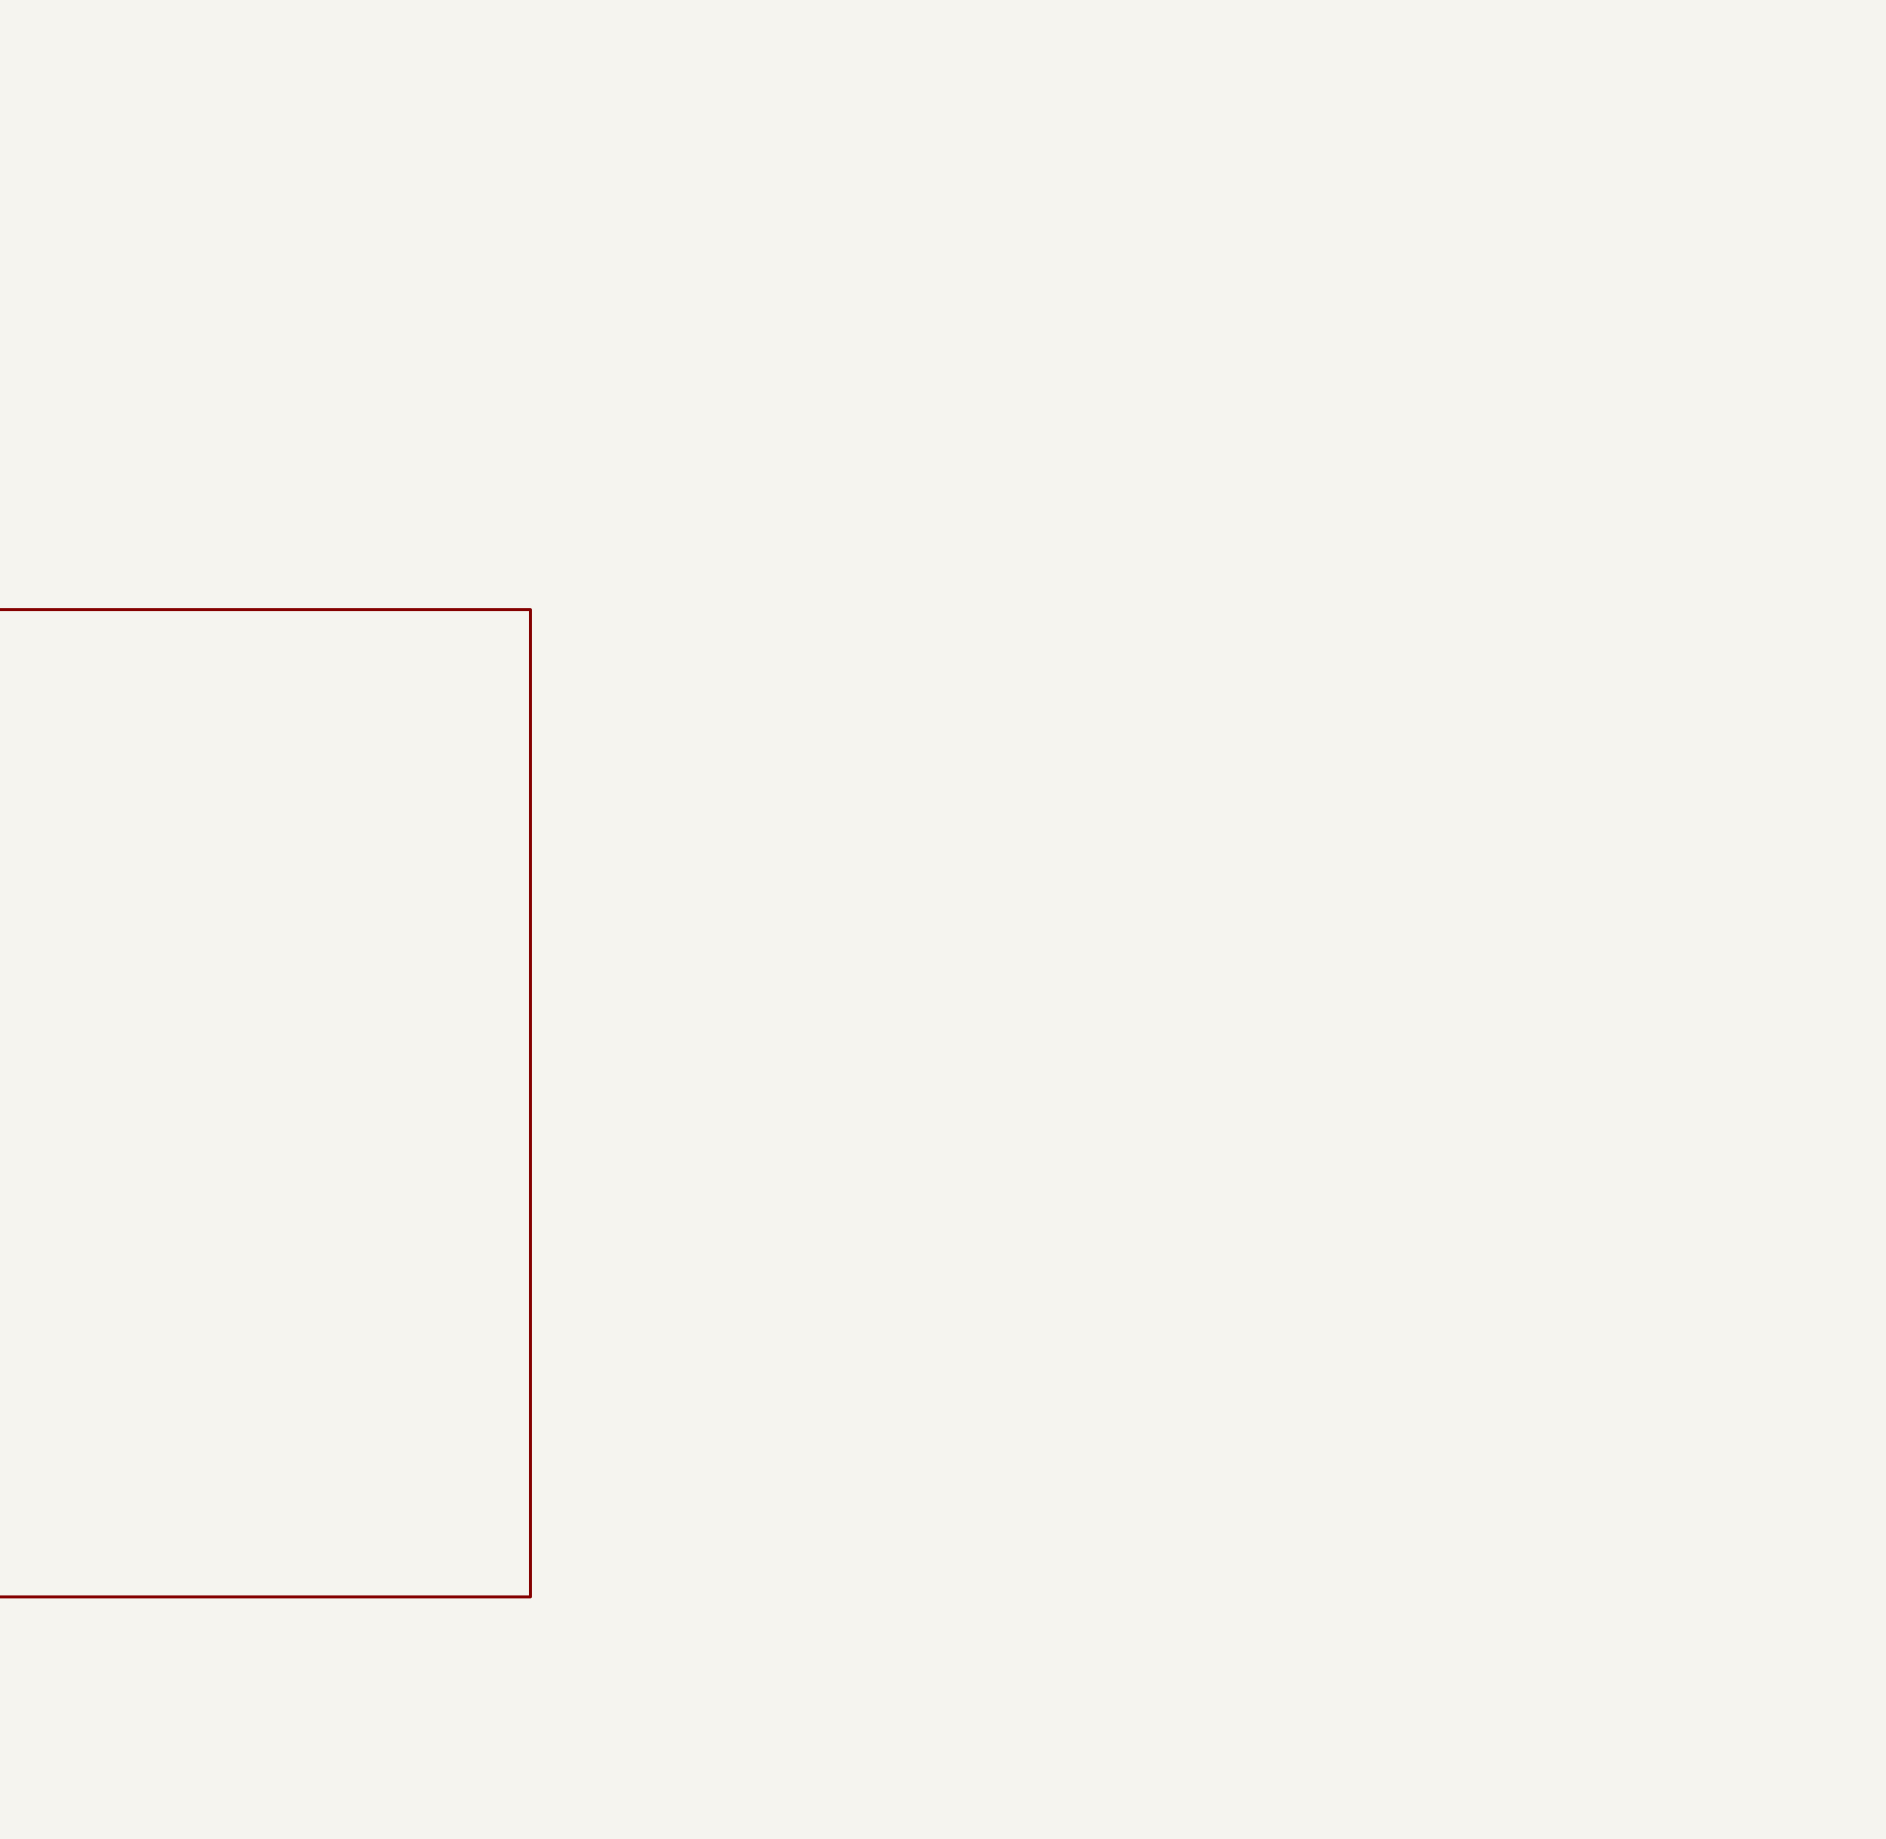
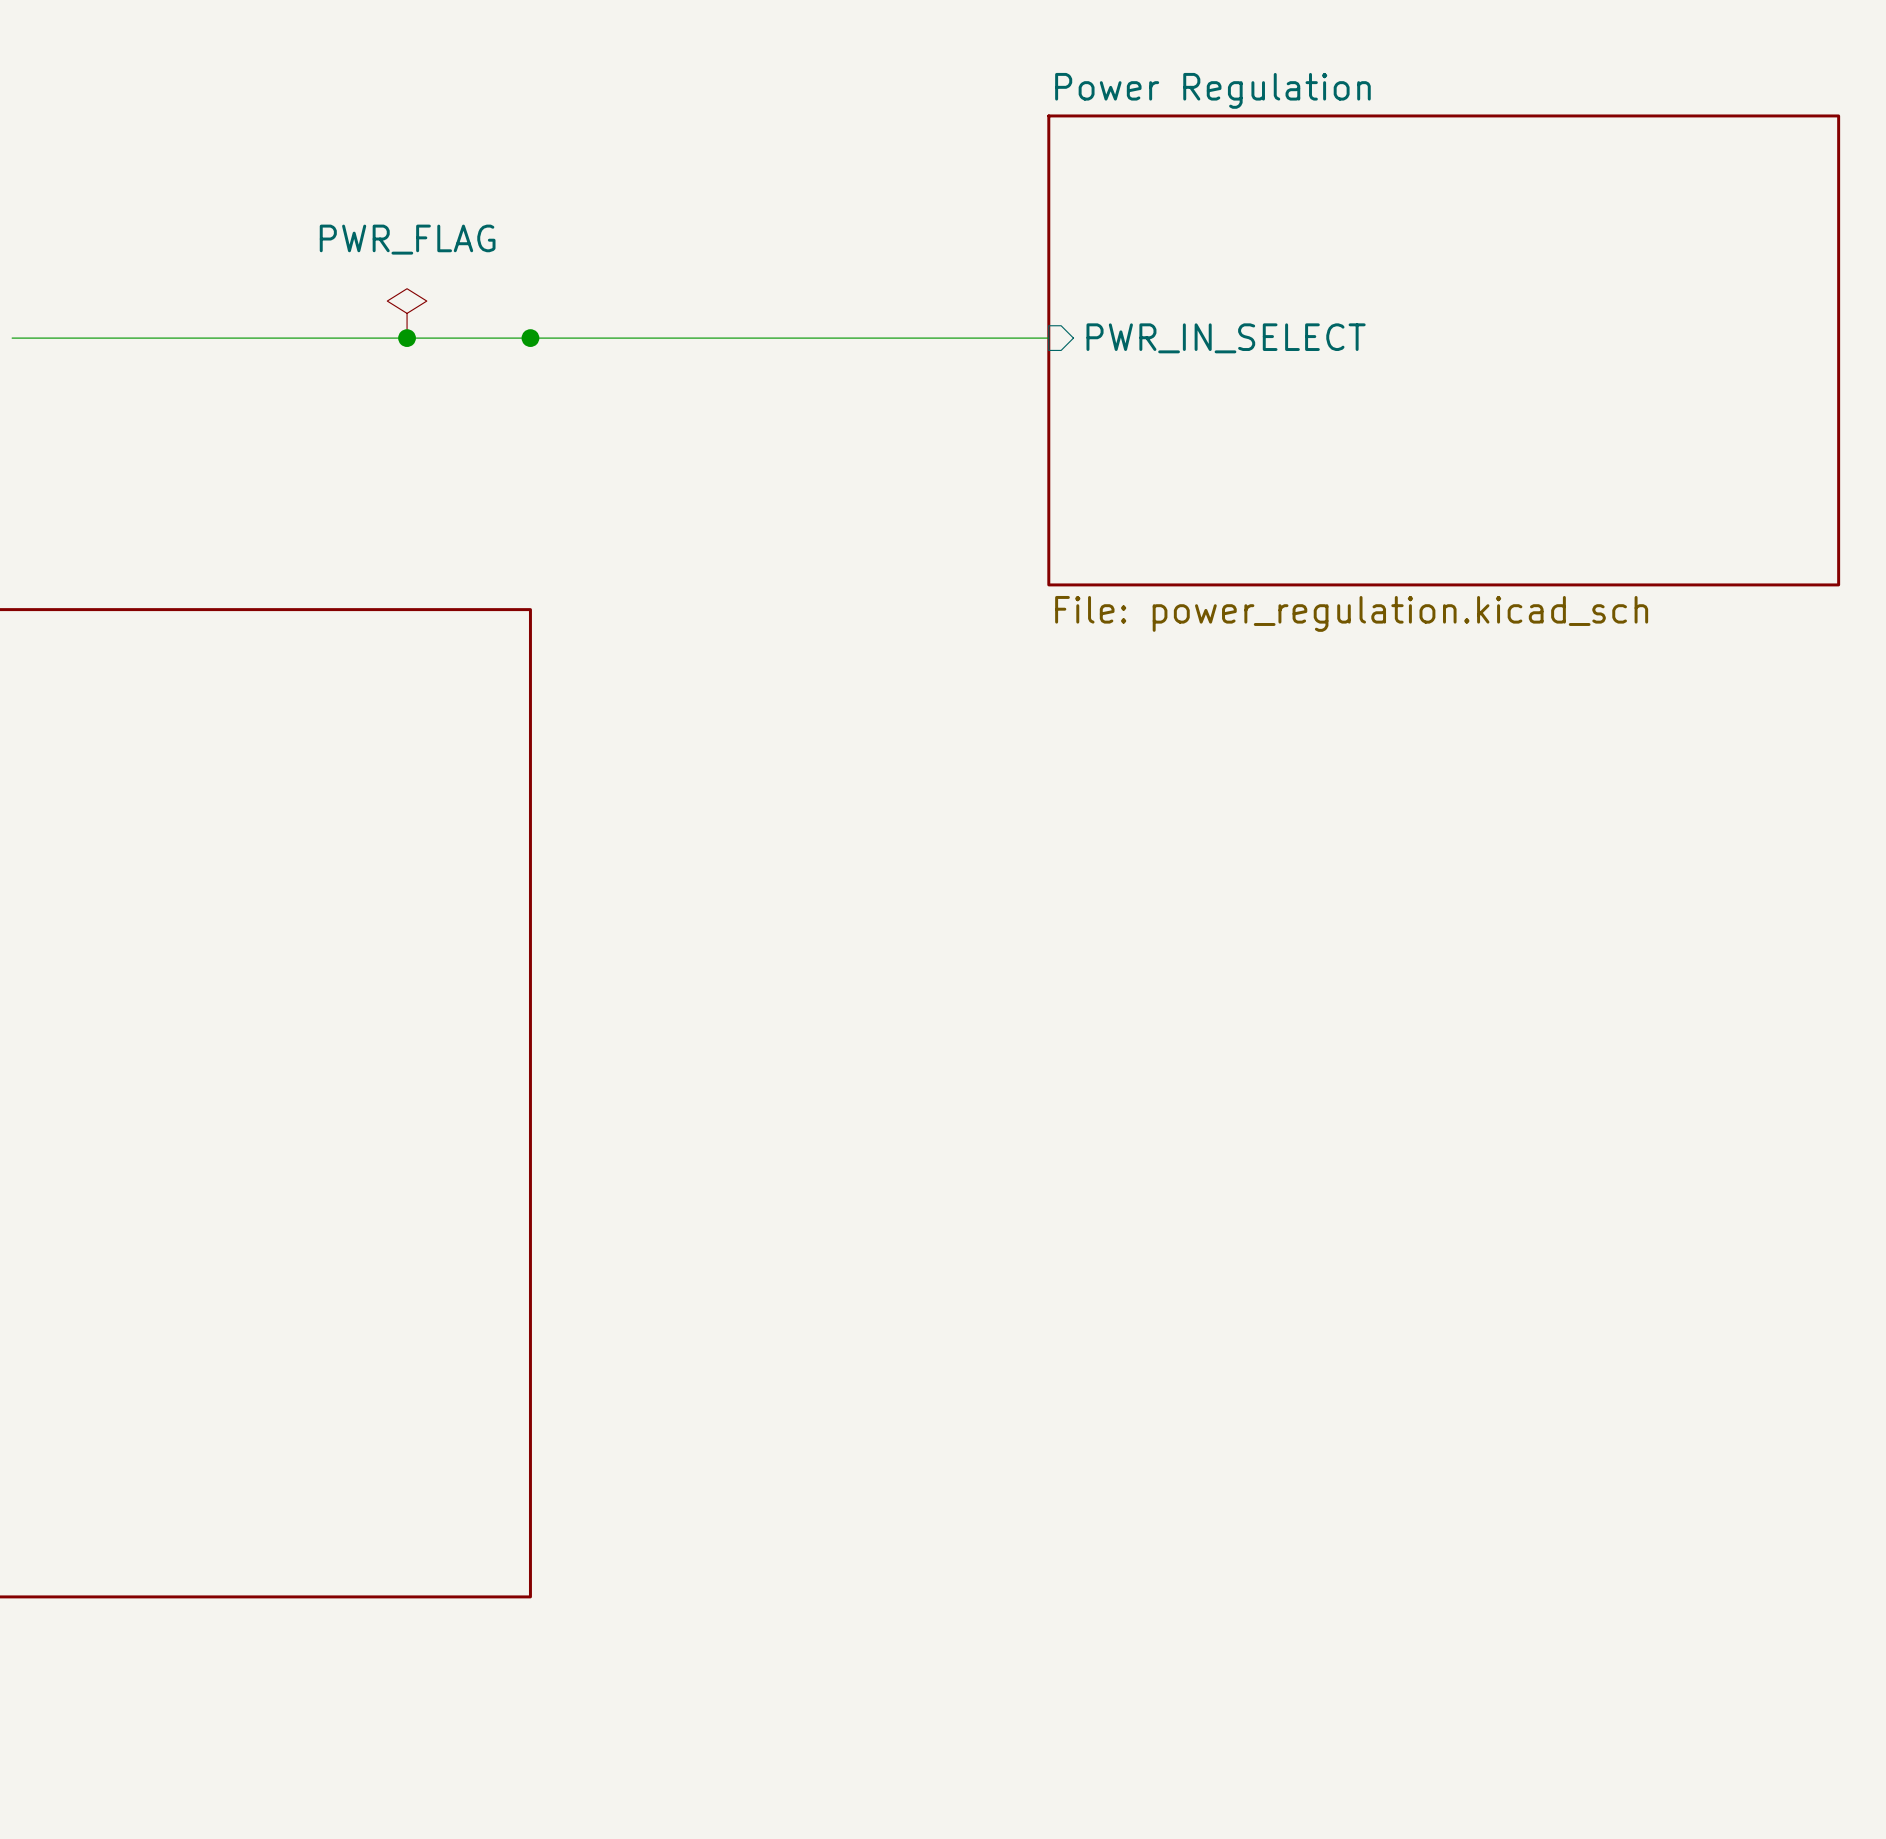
power symbol: none -> PWR_FLAG (407, 313)
wire: none -> (12, 338) (1048, 338)
junction: none -> (407, 338)
junction: none -> (530, 338)
sheet pin: none -> PWR_IN_SELECT (1226, 338)
sheet Power Regulation: none -> File: power_regulation.kicad_sch (1443, 350)

